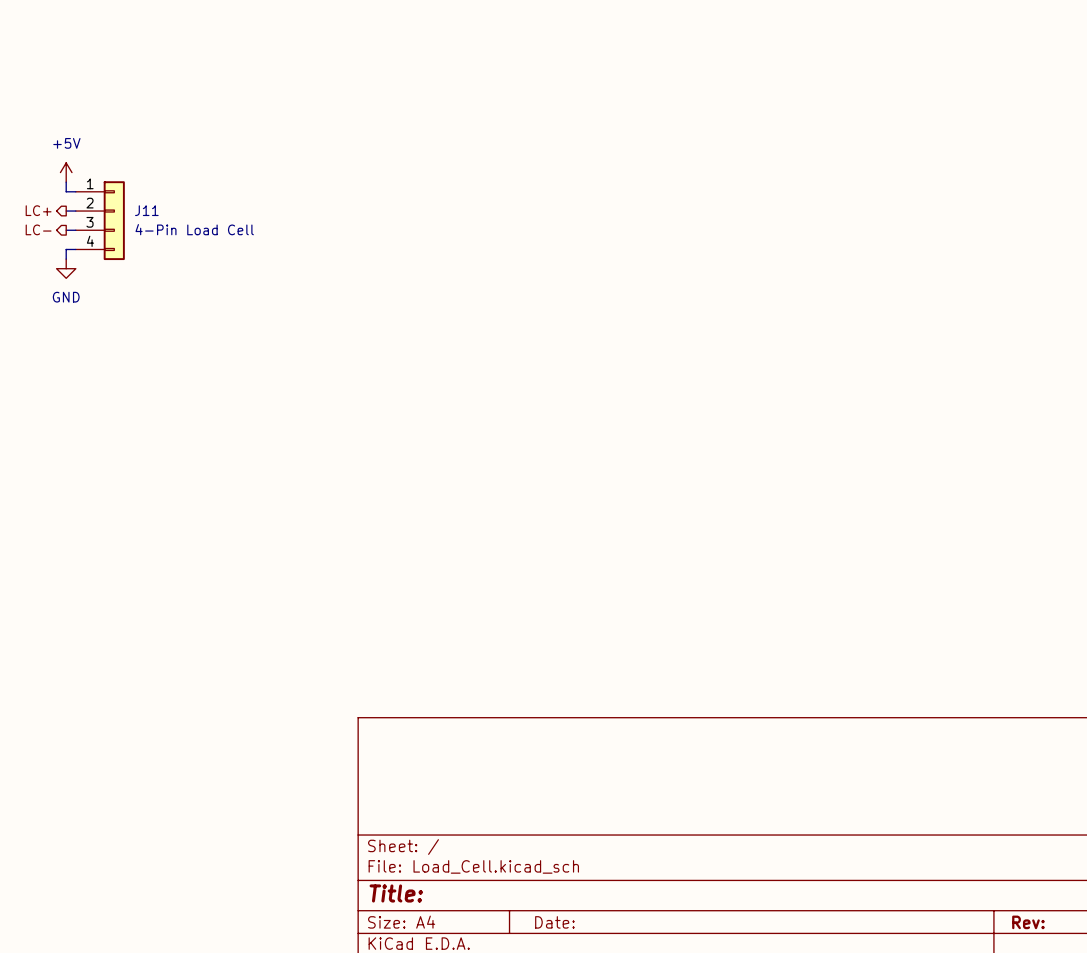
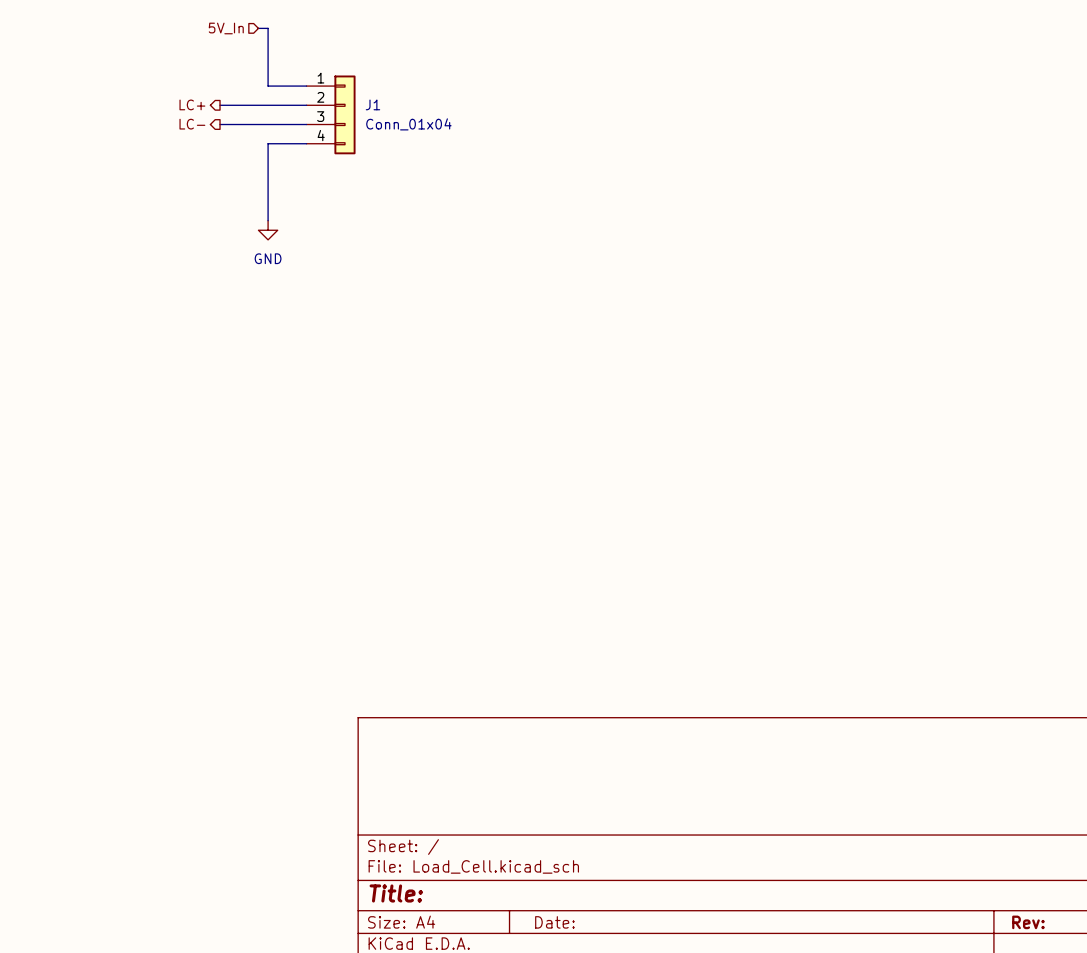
hierarchical label: none -> 5V_In (226, 28)
wire: none -> (258, 28) (268, 28) (268, 86) (306, 86)
wire: none -> (220, 105) (306, 105)
J1: none -> Conn_01x04 (331, 114)
wire: none -> (220, 124) (306, 124)
wire: none -> (306, 143) (268, 143) (268, 220)
power symbol: +5V (66, 172) -> none
wire: (66, 182) (66, 191) (75, 191) -> none
hierarchical label position: LC+ (38, 210) -> LC+ (192, 104)
wire: (66, 211) (75, 211) -> none
J11: 4-Pin Load Cell (100, 220) -> none
hierarchical label position: LC- (38, 229) -> LC- (192, 124)
wire: (66, 230) (75, 230) -> none
power symbol: none -> GND (268, 230)
wire: (75, 249) (66, 249) (66, 259) -> none
power symbol: GND (66, 268) -> none

